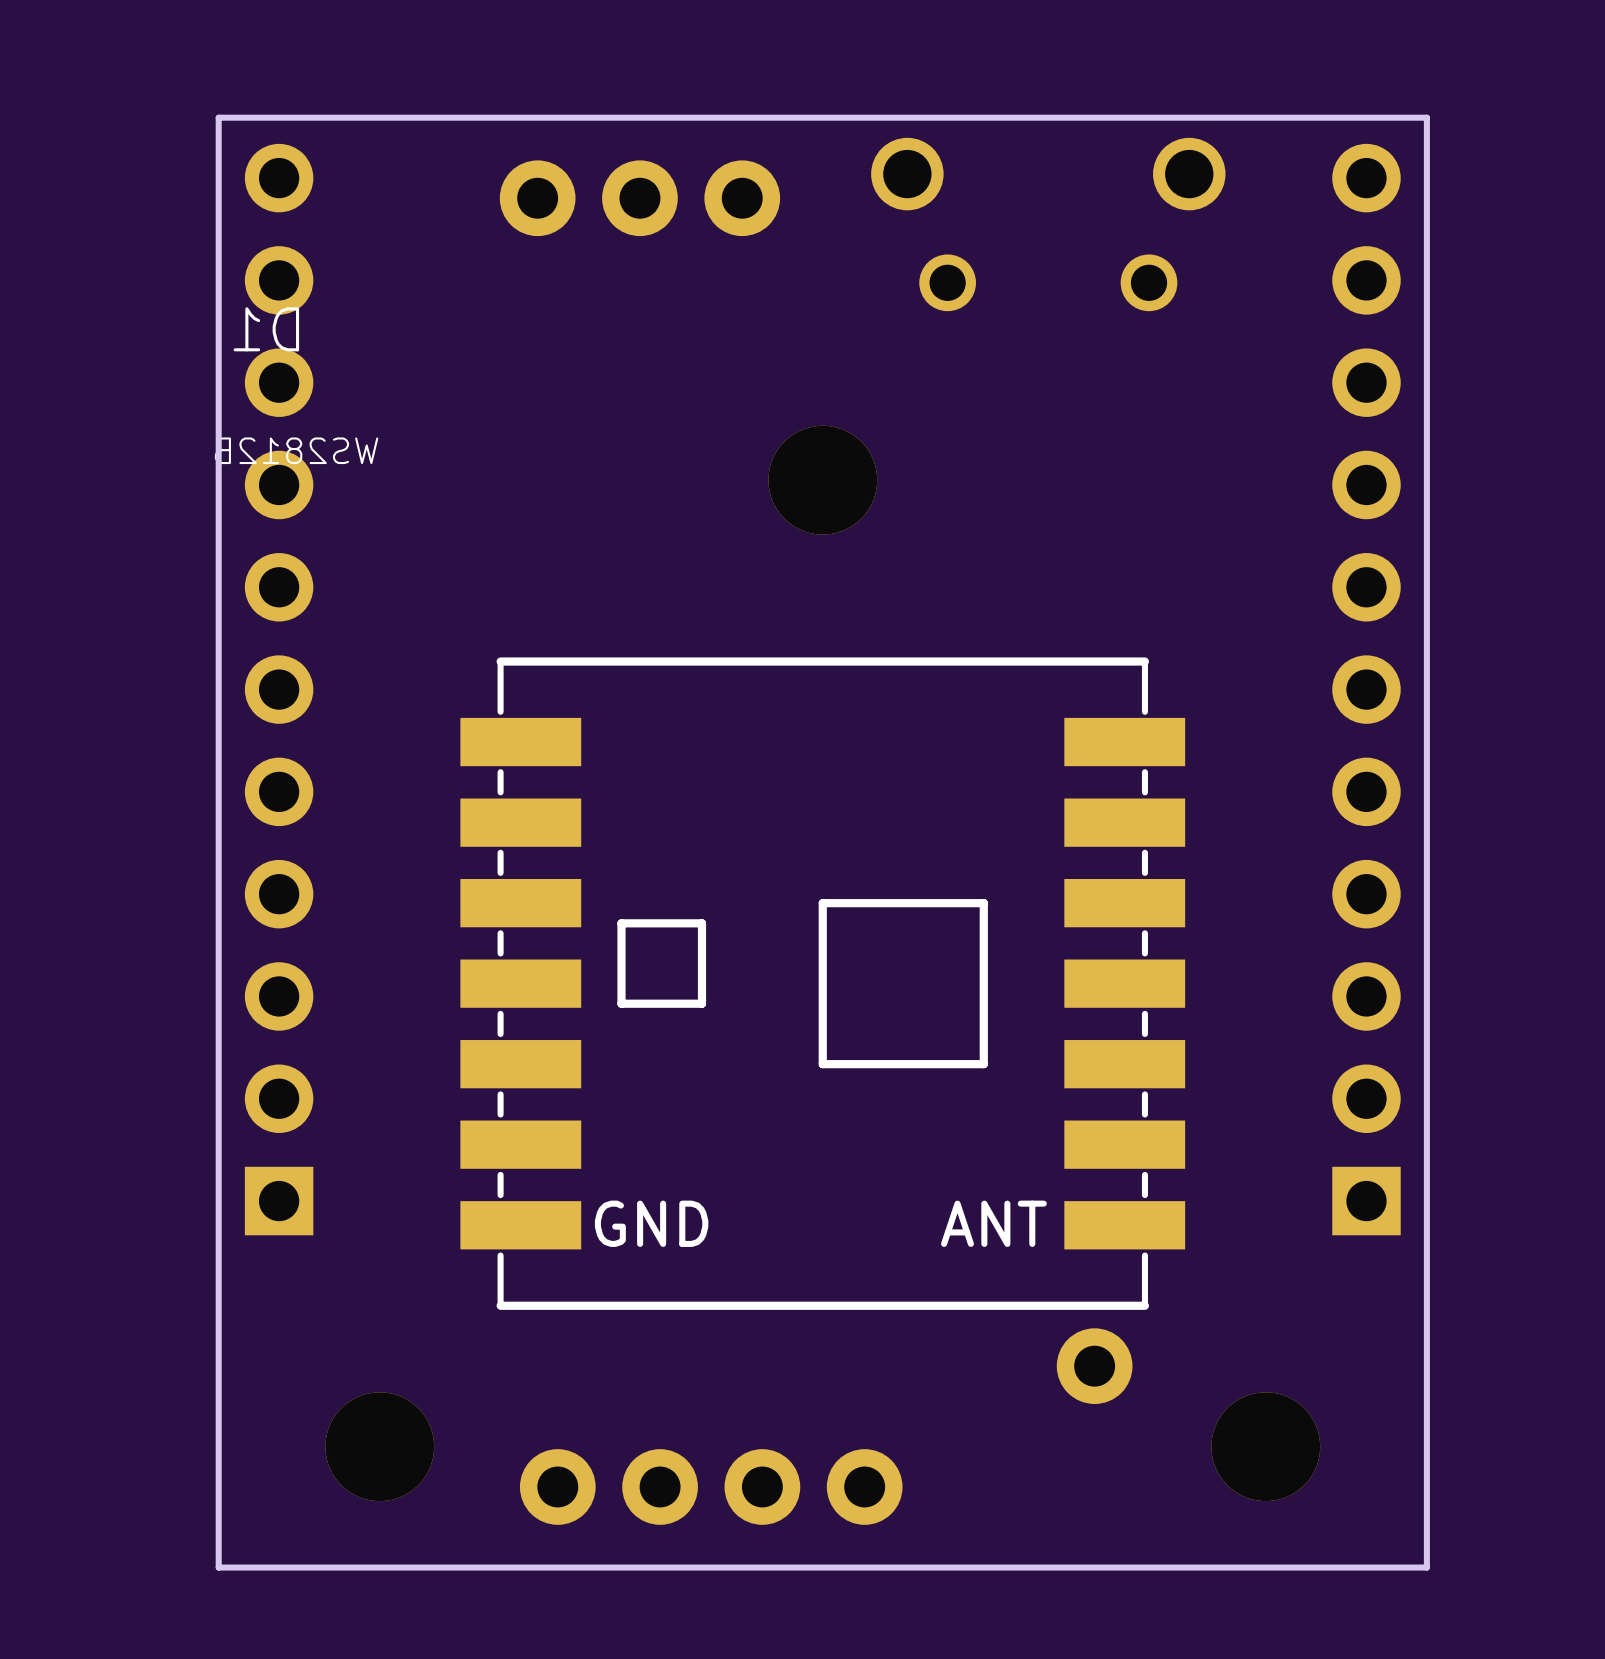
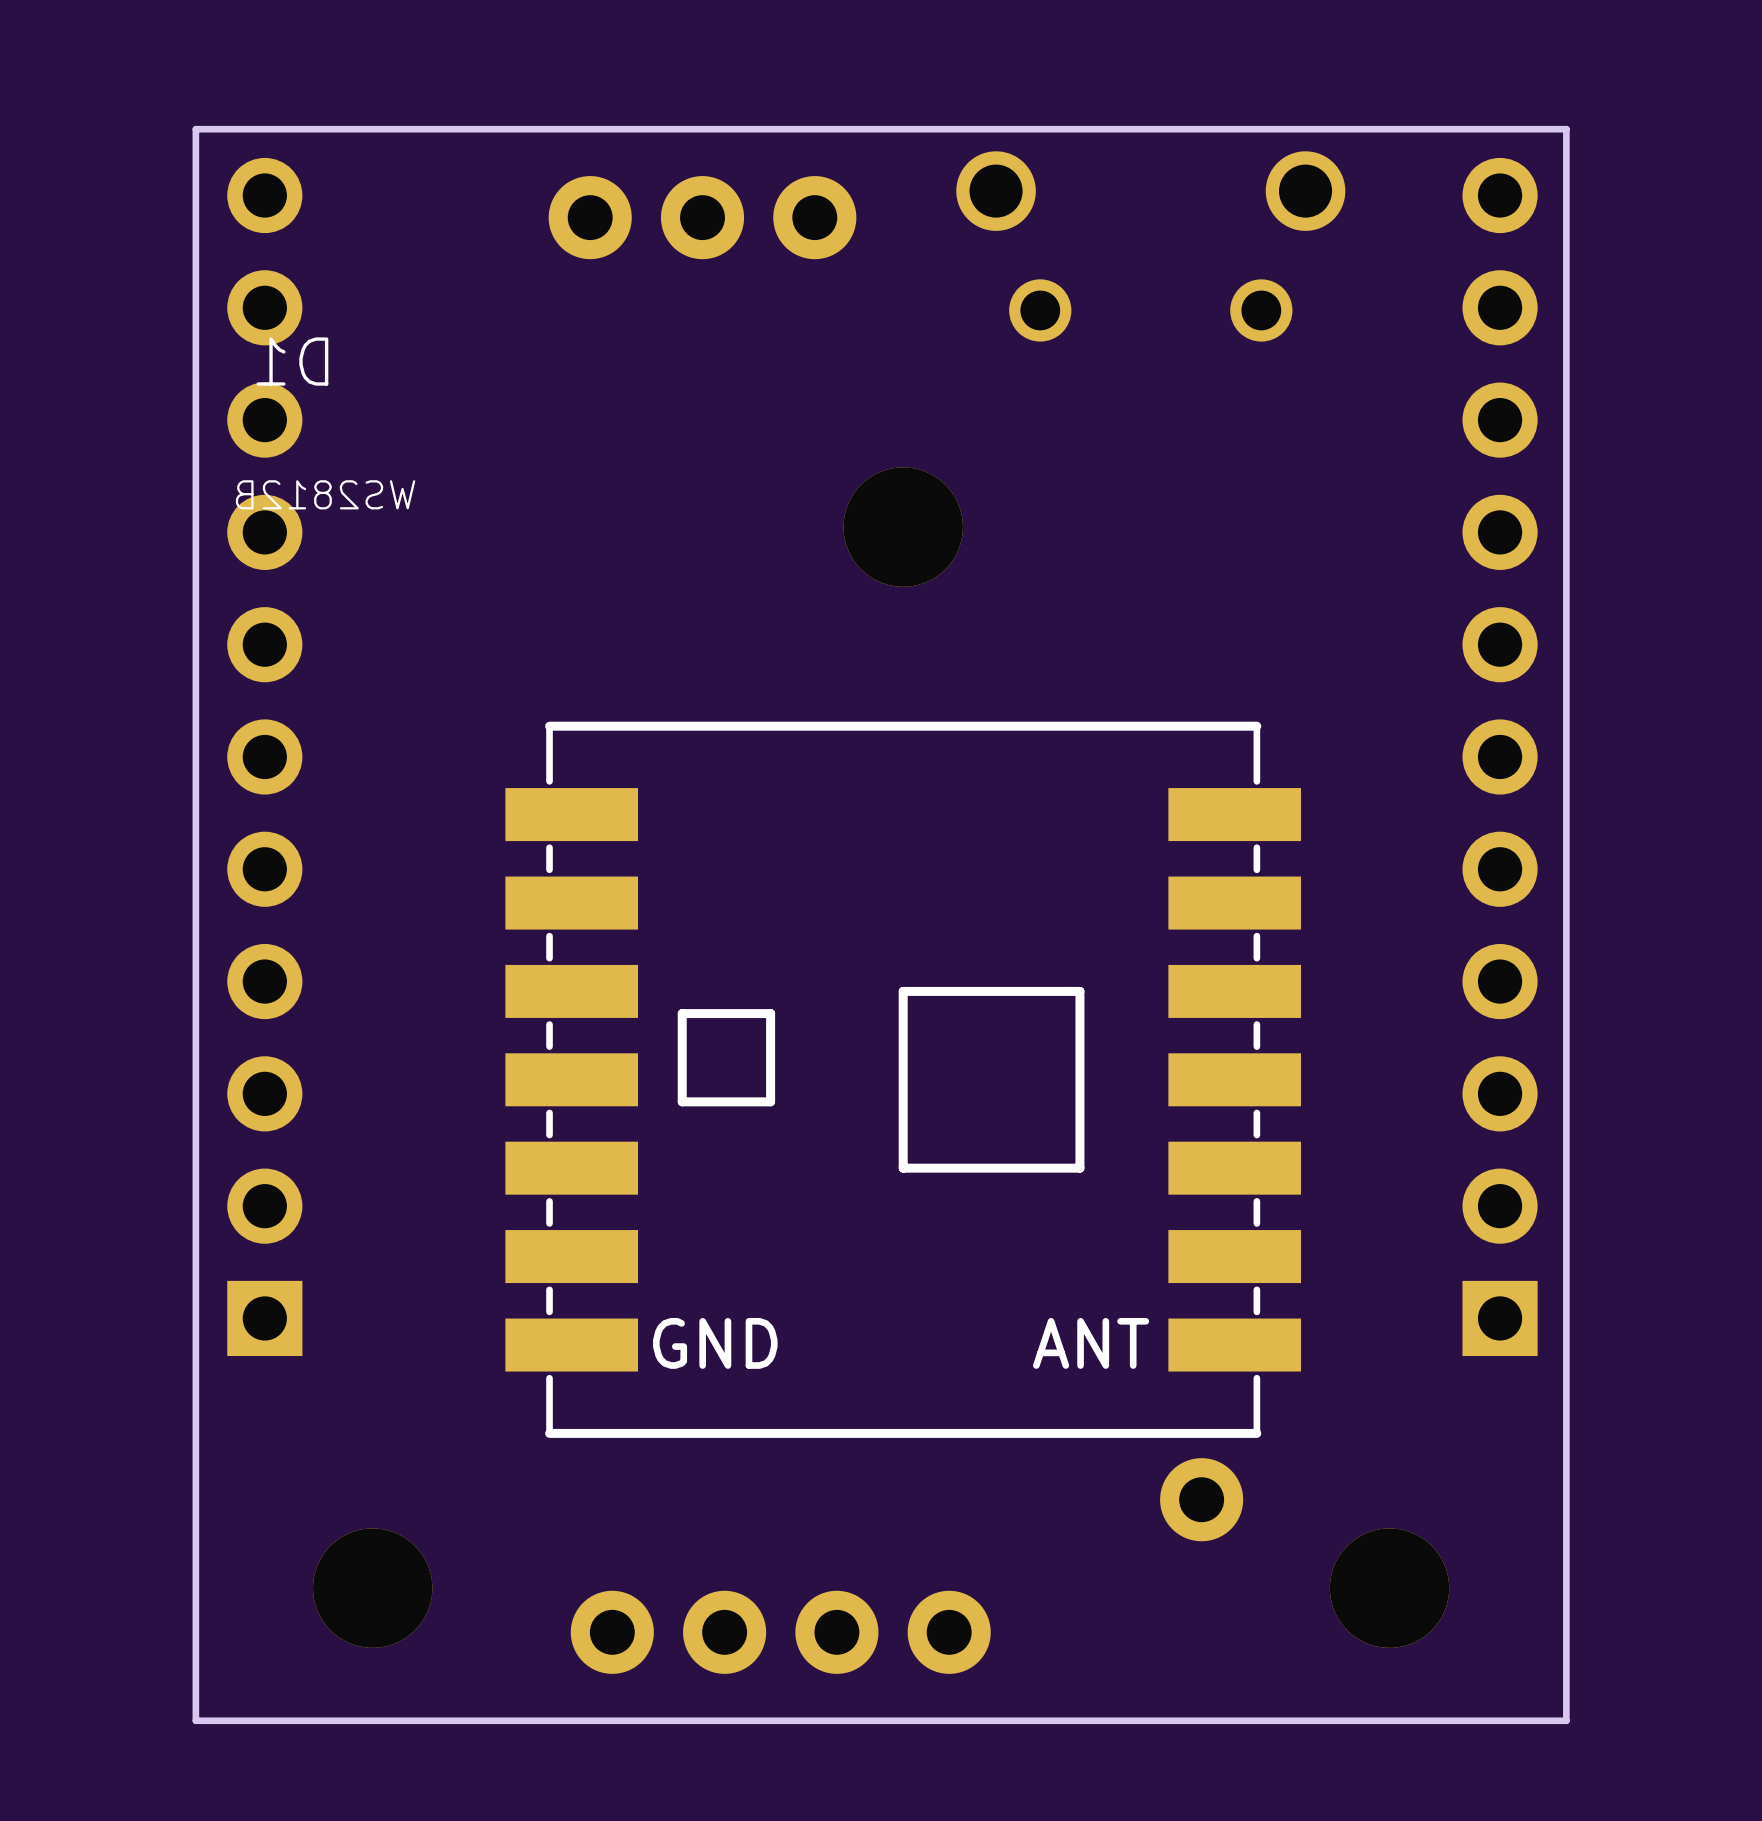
board edge: (218, 117) (218, 1567) -> (240, 129) (195, 129) (195, 1720) (240, 1720)
part position: (279, 689) -> (264, 756)
part position: (379, 1446) -> (372, 1588)

